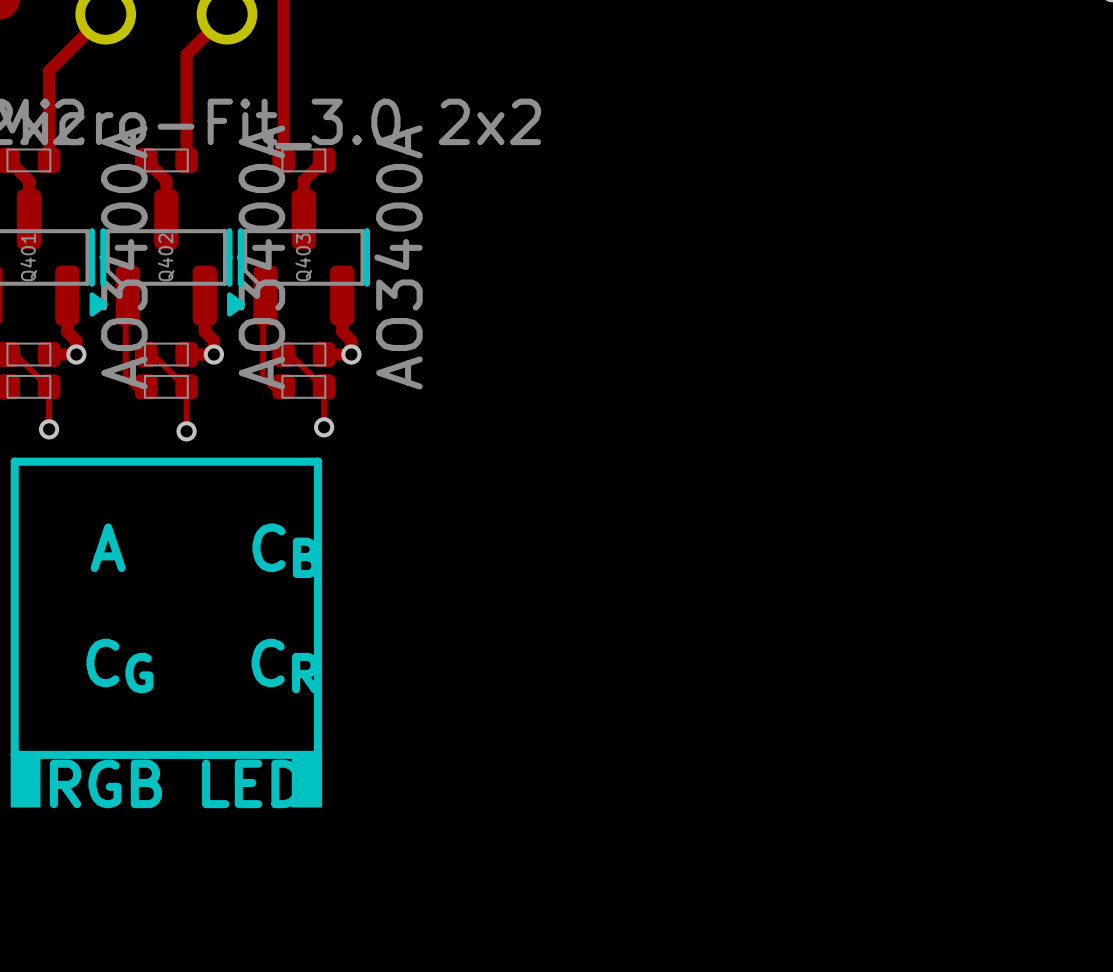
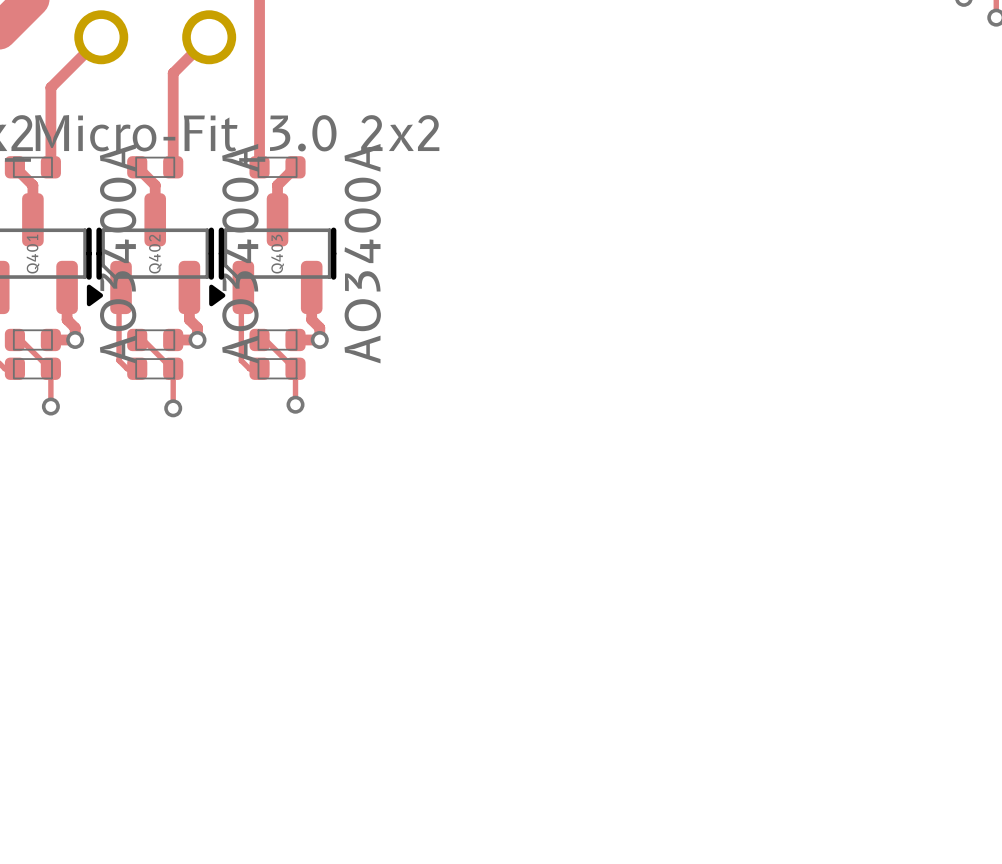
line: (14, 461) (318, 461) (318, 754) (14, 754) (14, 461) -> none
text: A CB (205, 550) -> none
text: CG CR (202, 666) -> none
drawing: [10, 752, 41, 808] -> none
drawing: [291, 752, 323, 808] -> none
text: RGB LED (176, 783) -> none

